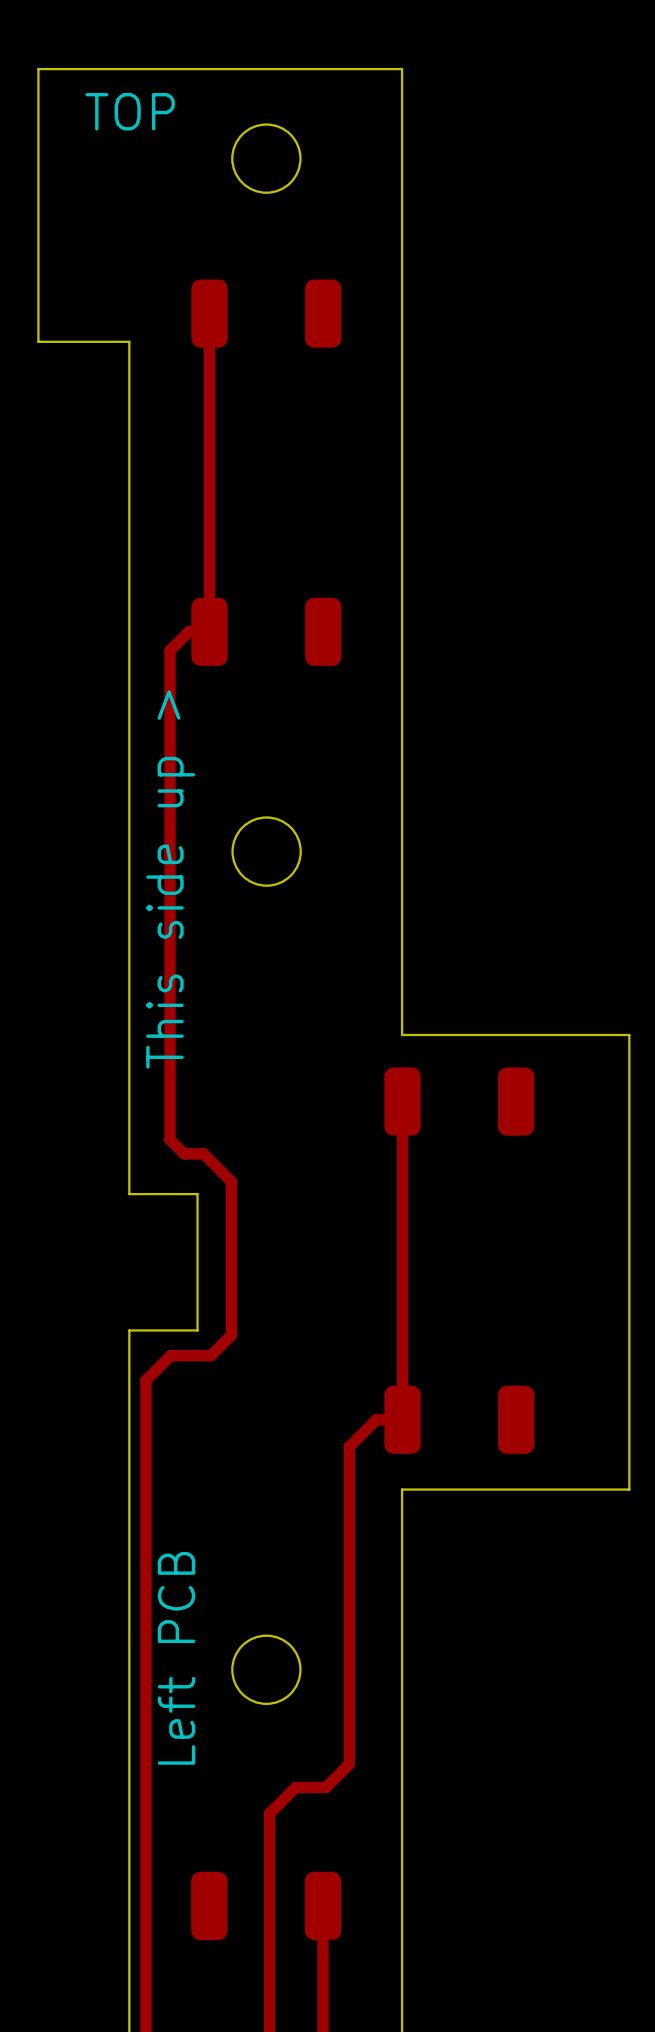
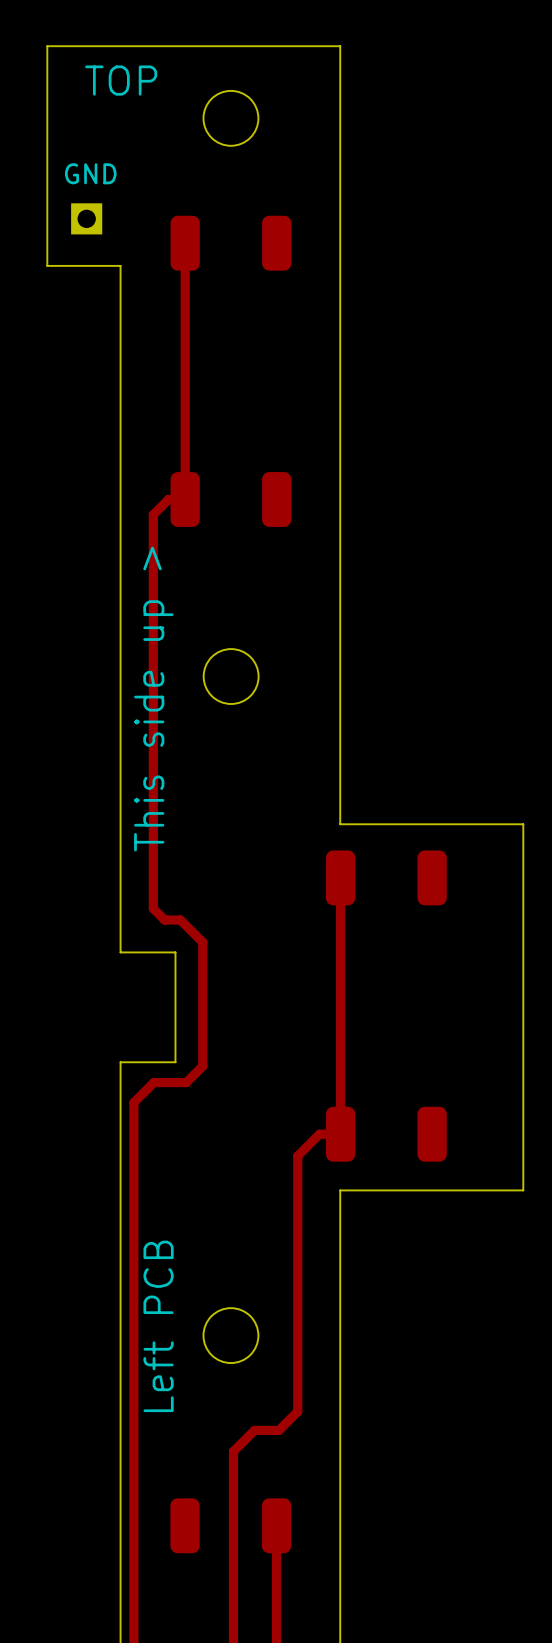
text: none -> GND (90, 173)
part: none -> (86, 218)

